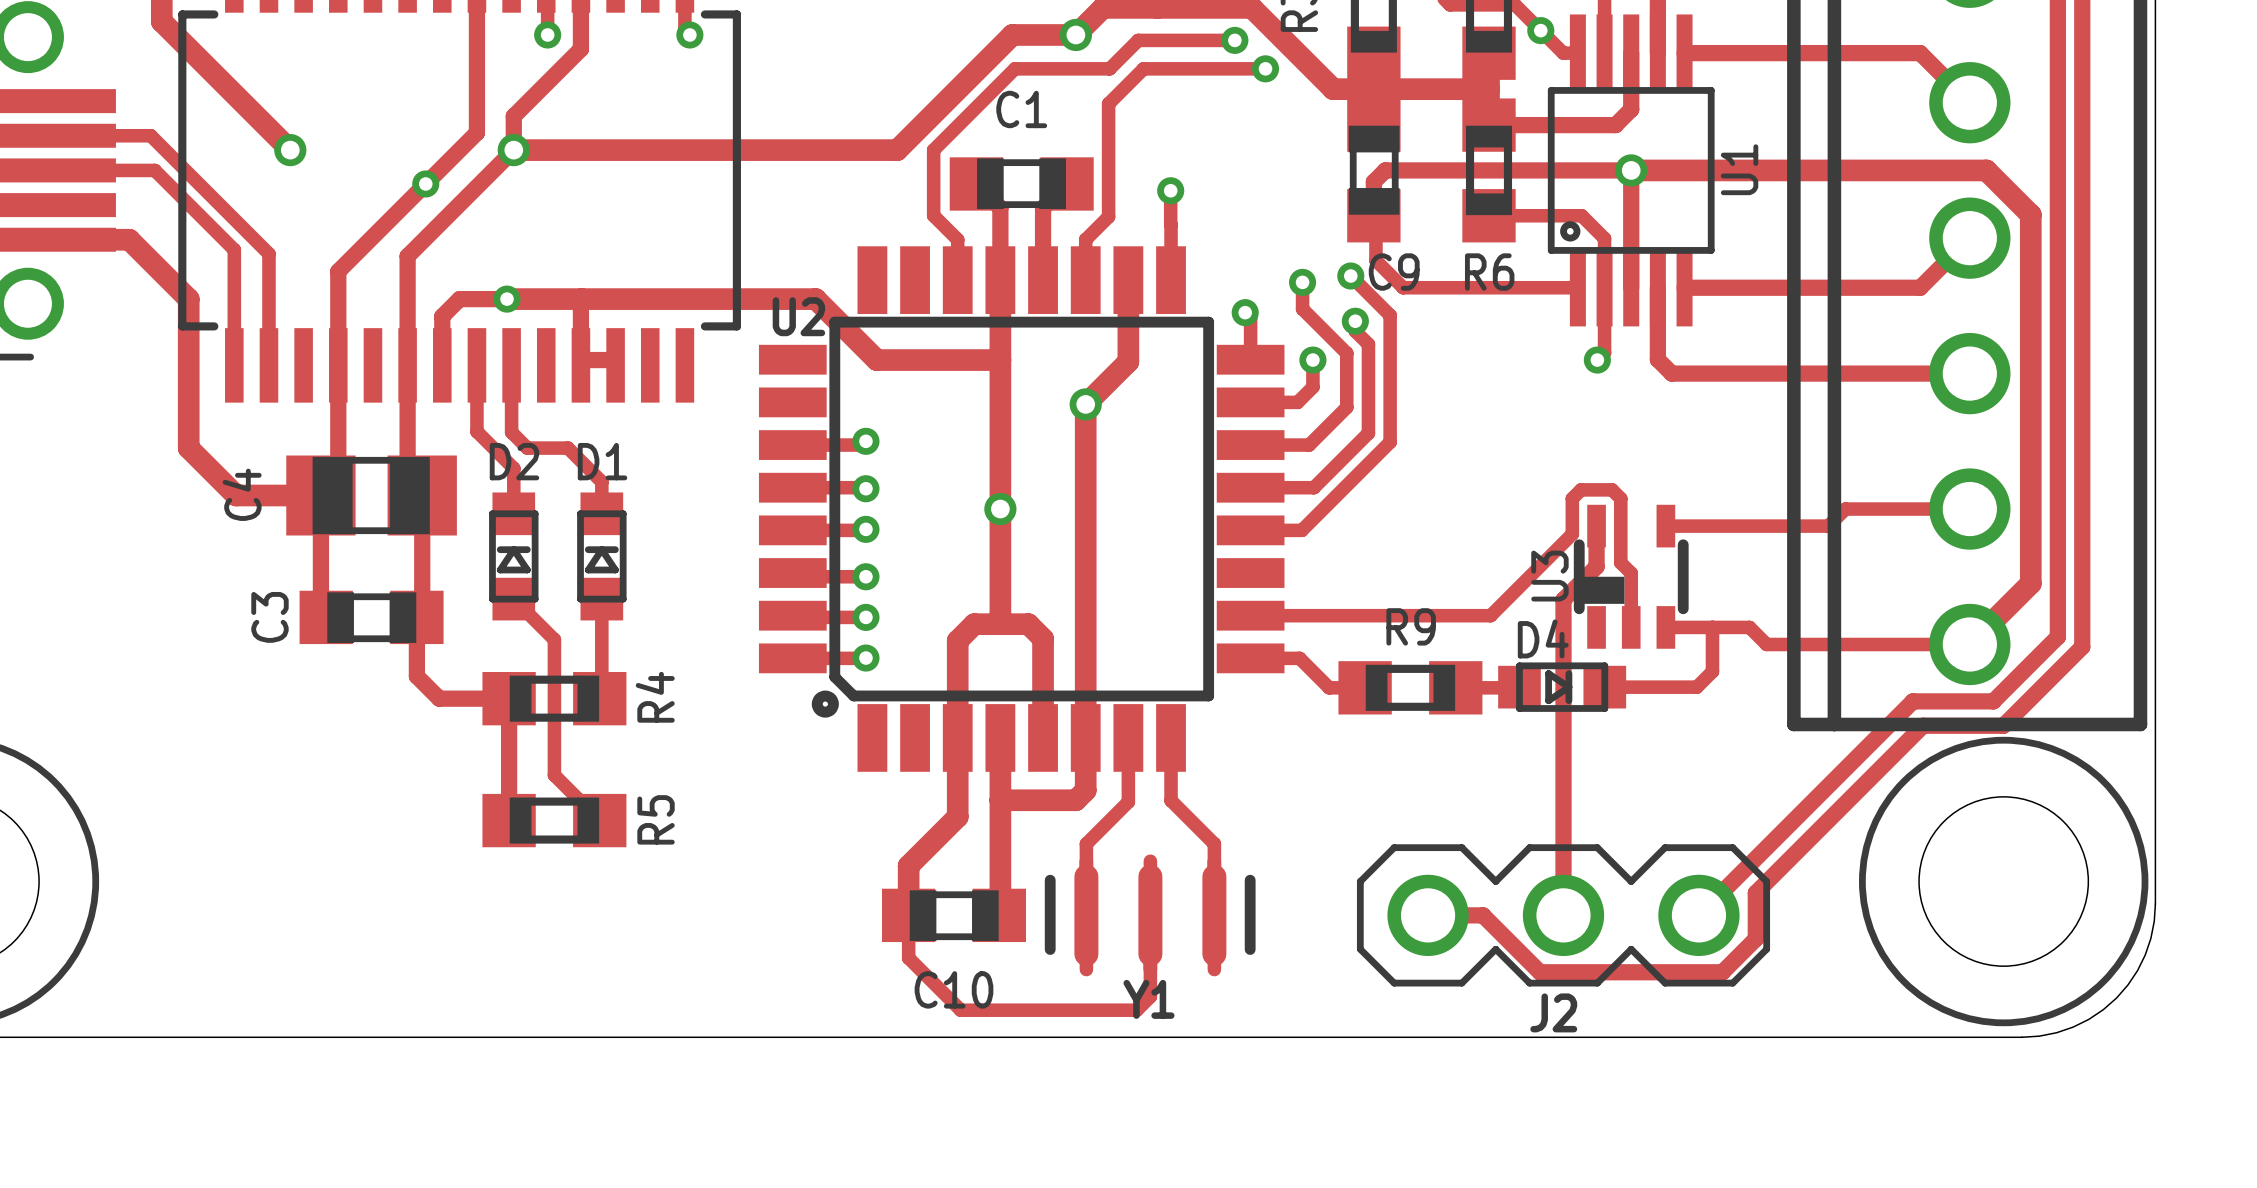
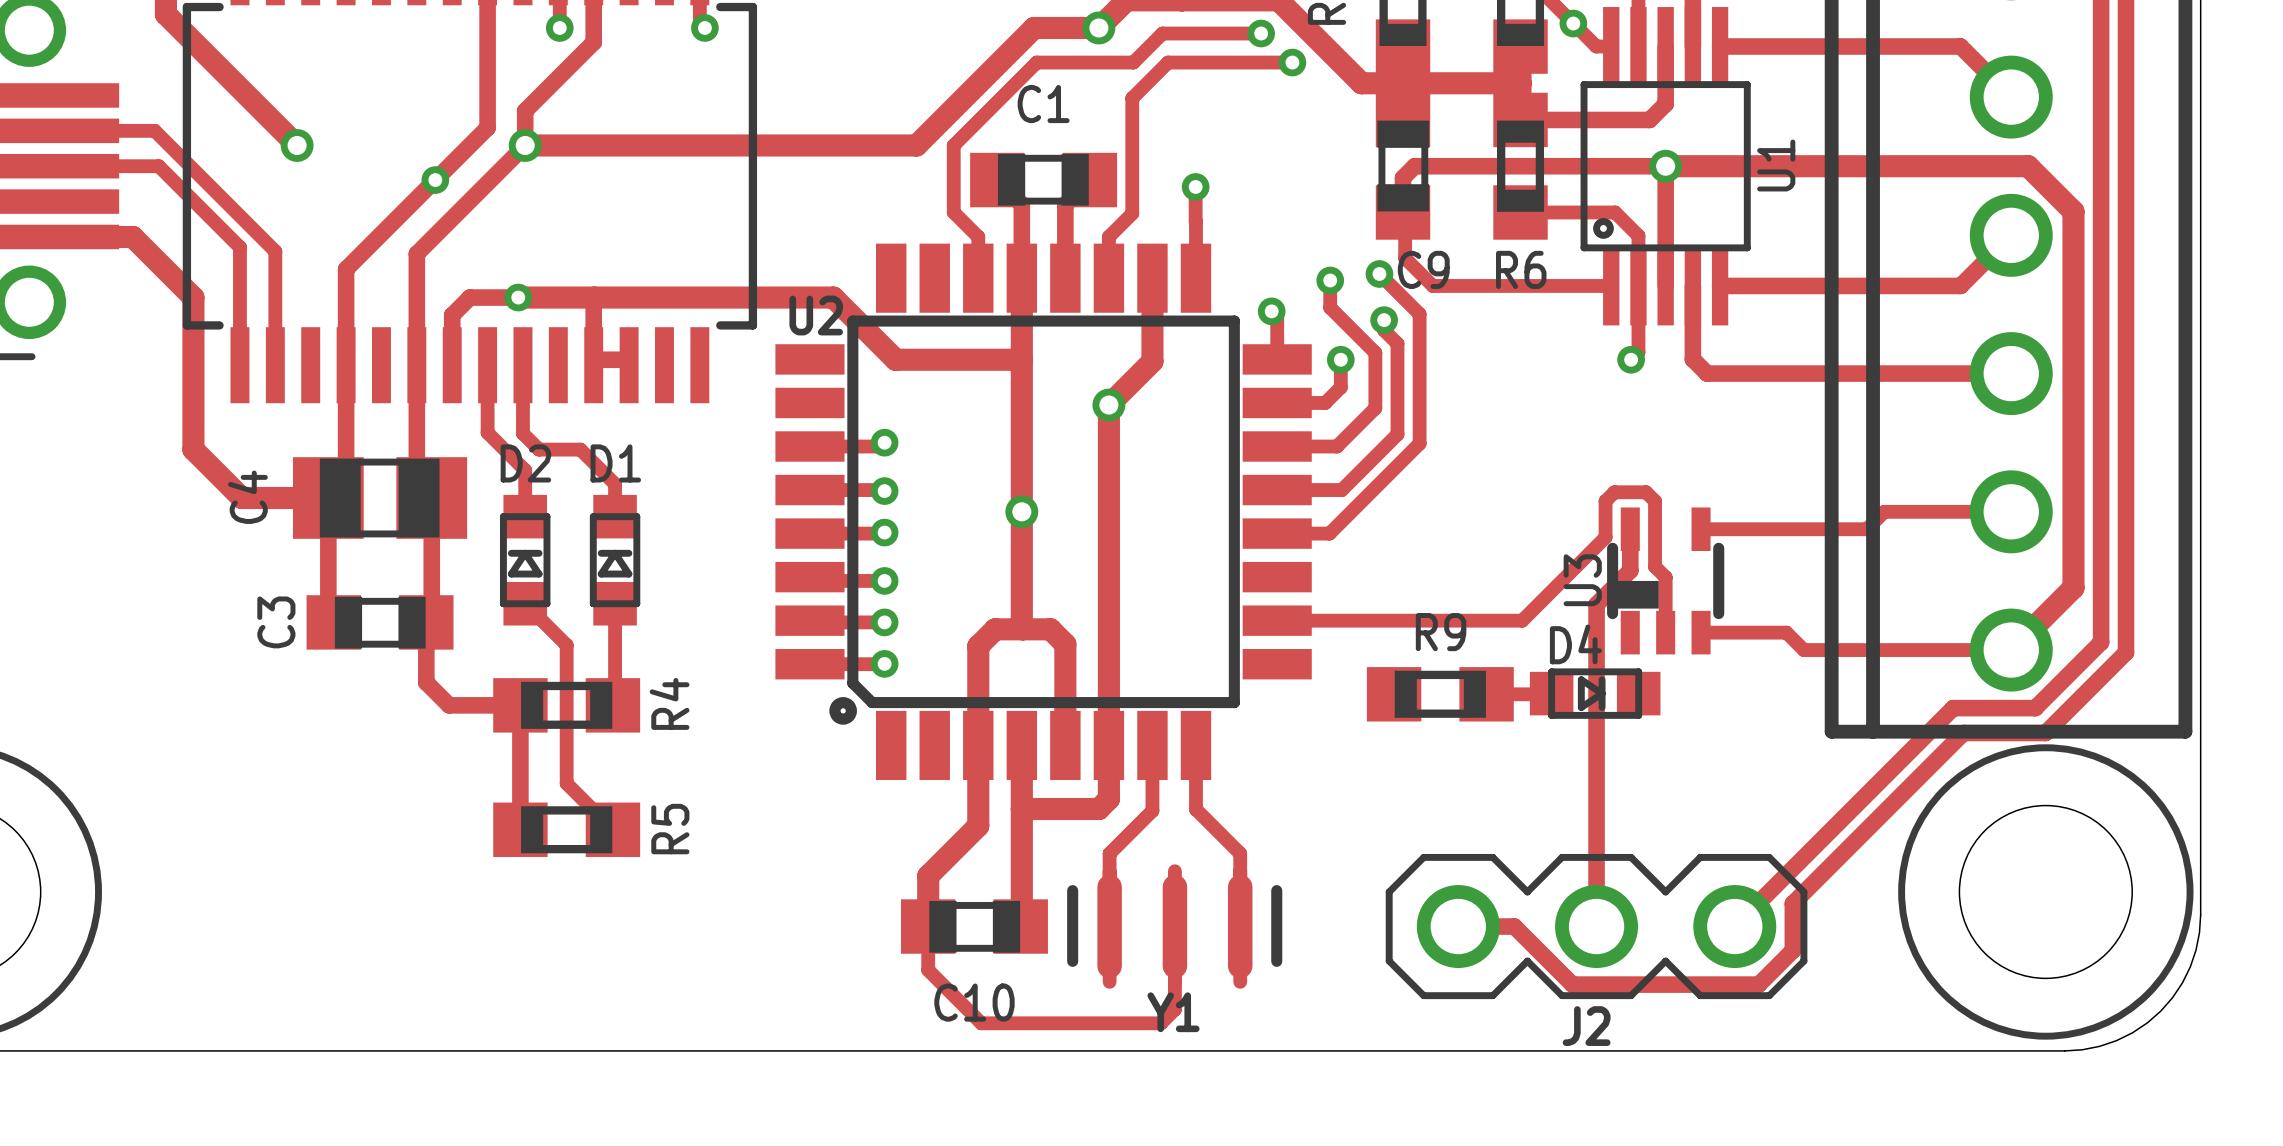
track: (1712, 627) (1712, 671) (1696, 687) (1604, 687) -> none
track: (1250, 658) (1299, 658) (1329, 687) (1365, 687) -> none

